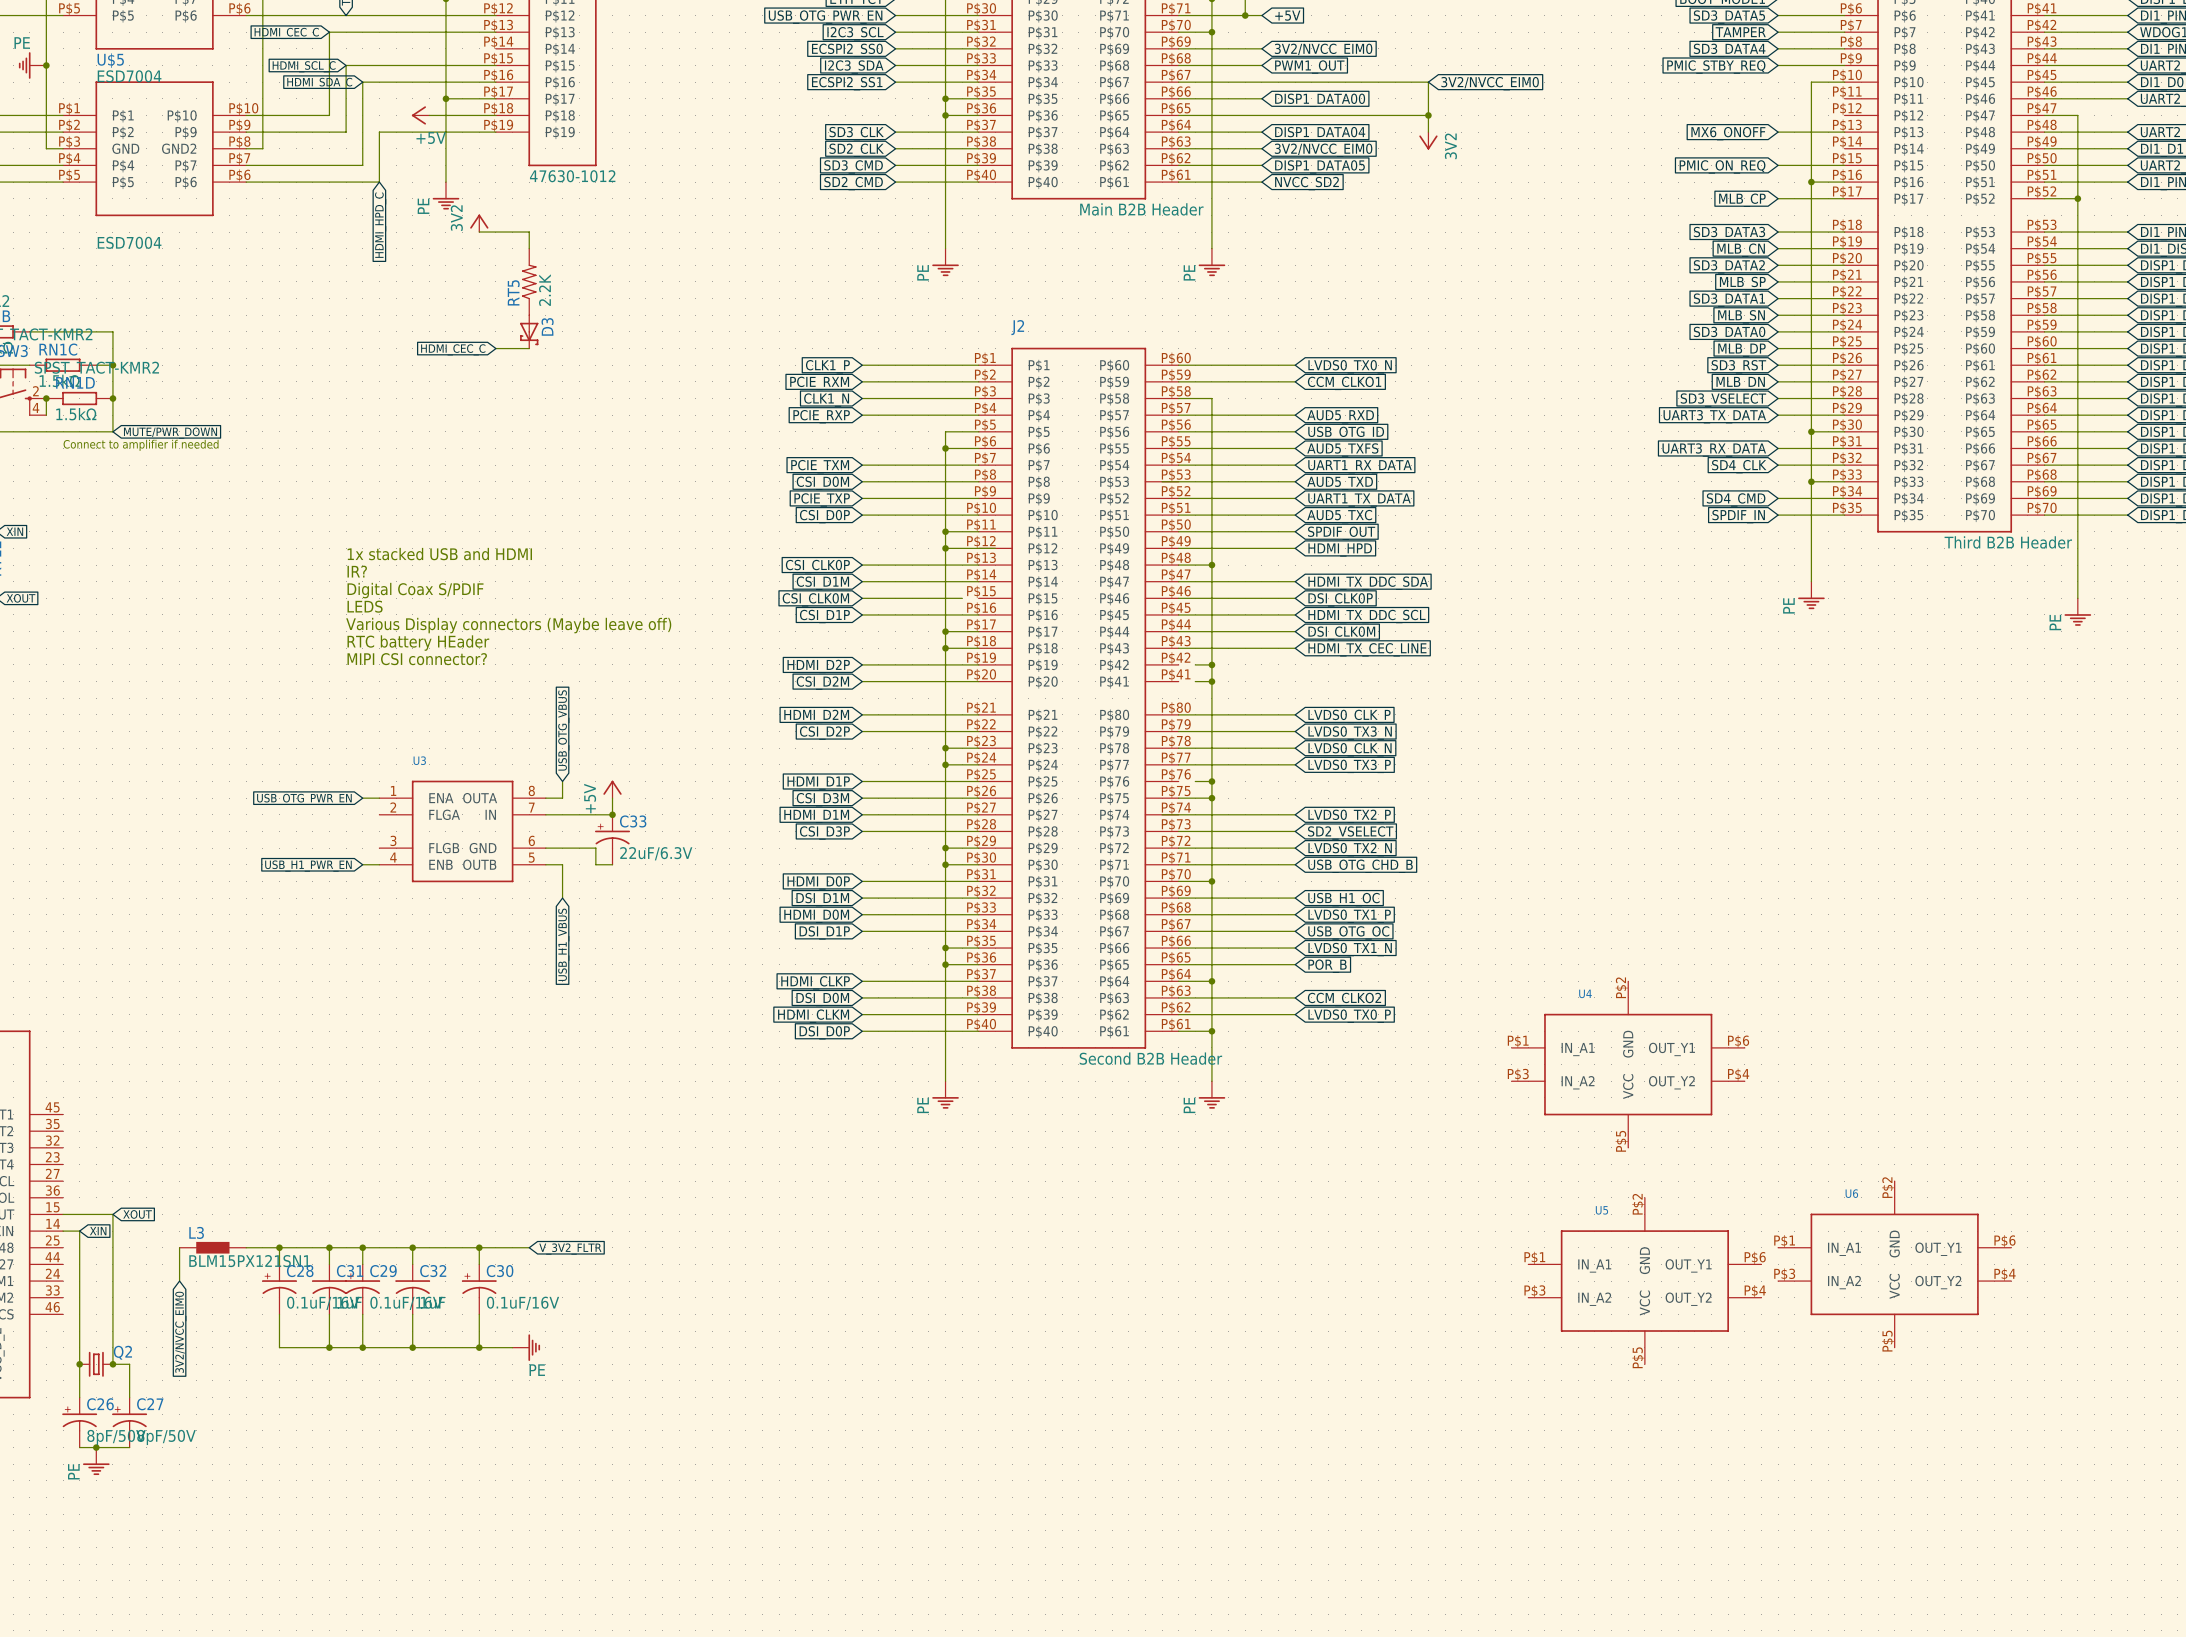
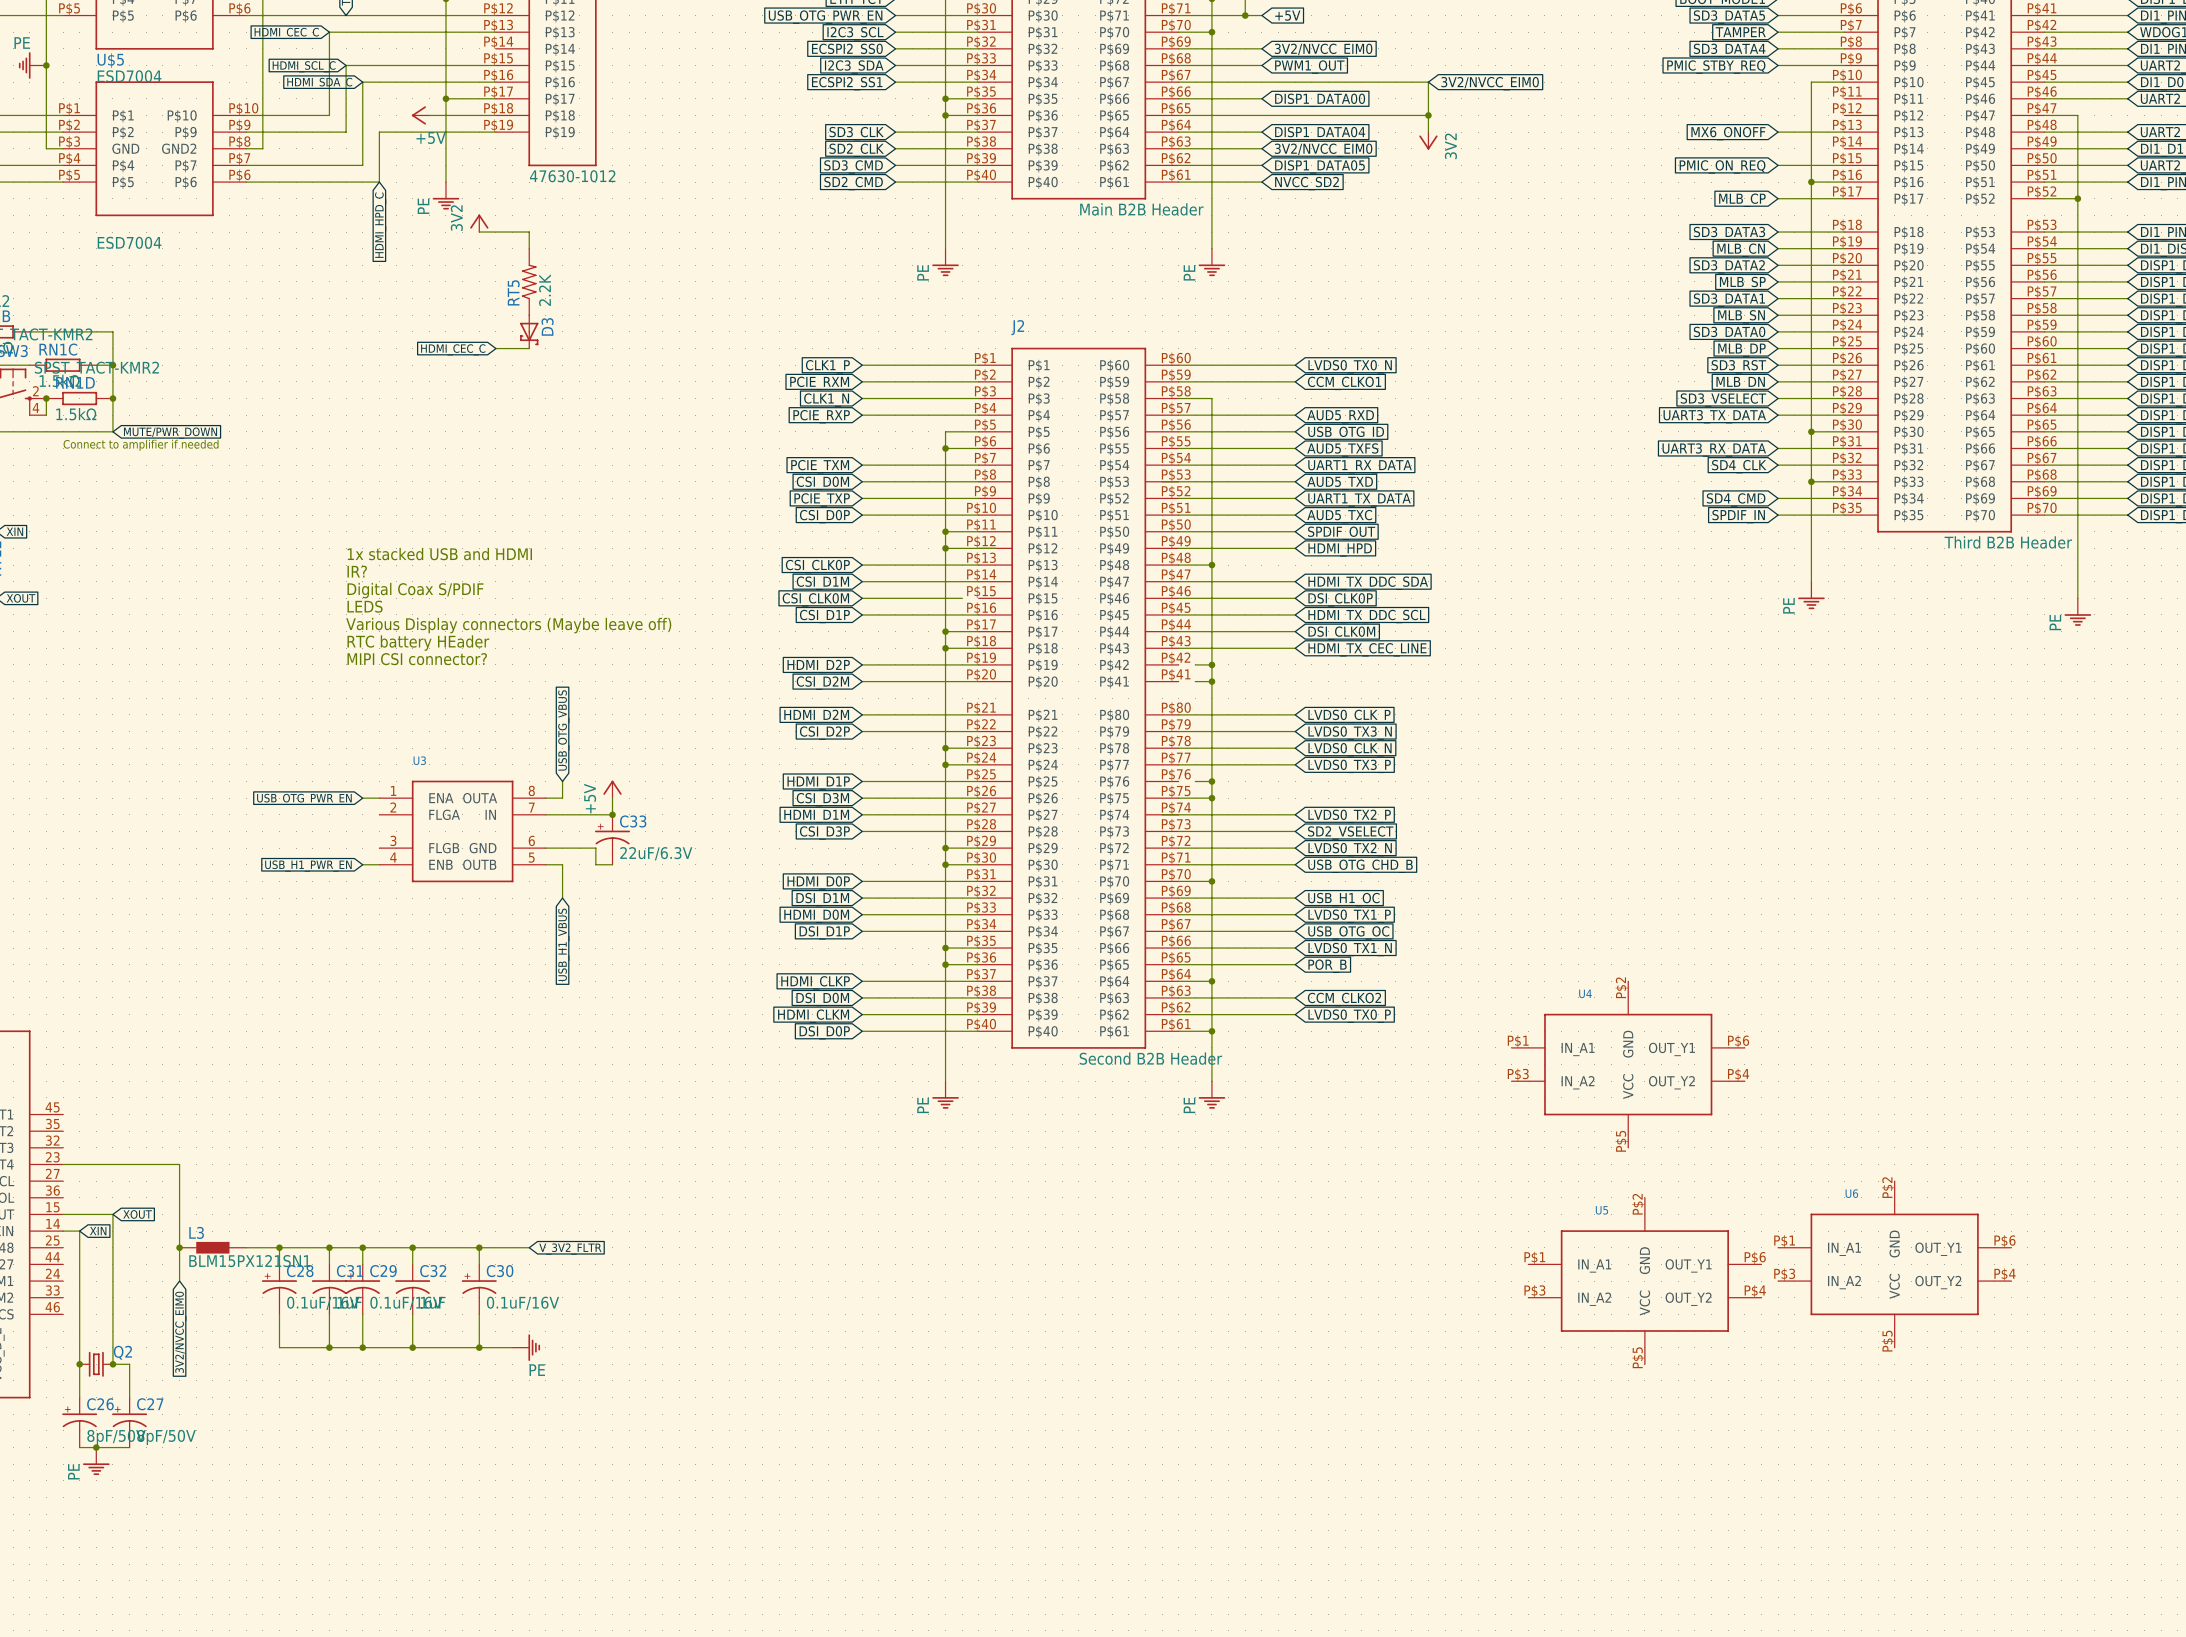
wire: none -> (63, 1164) (179, 1164) (179, 1247)
junction: none -> (179, 1247)

